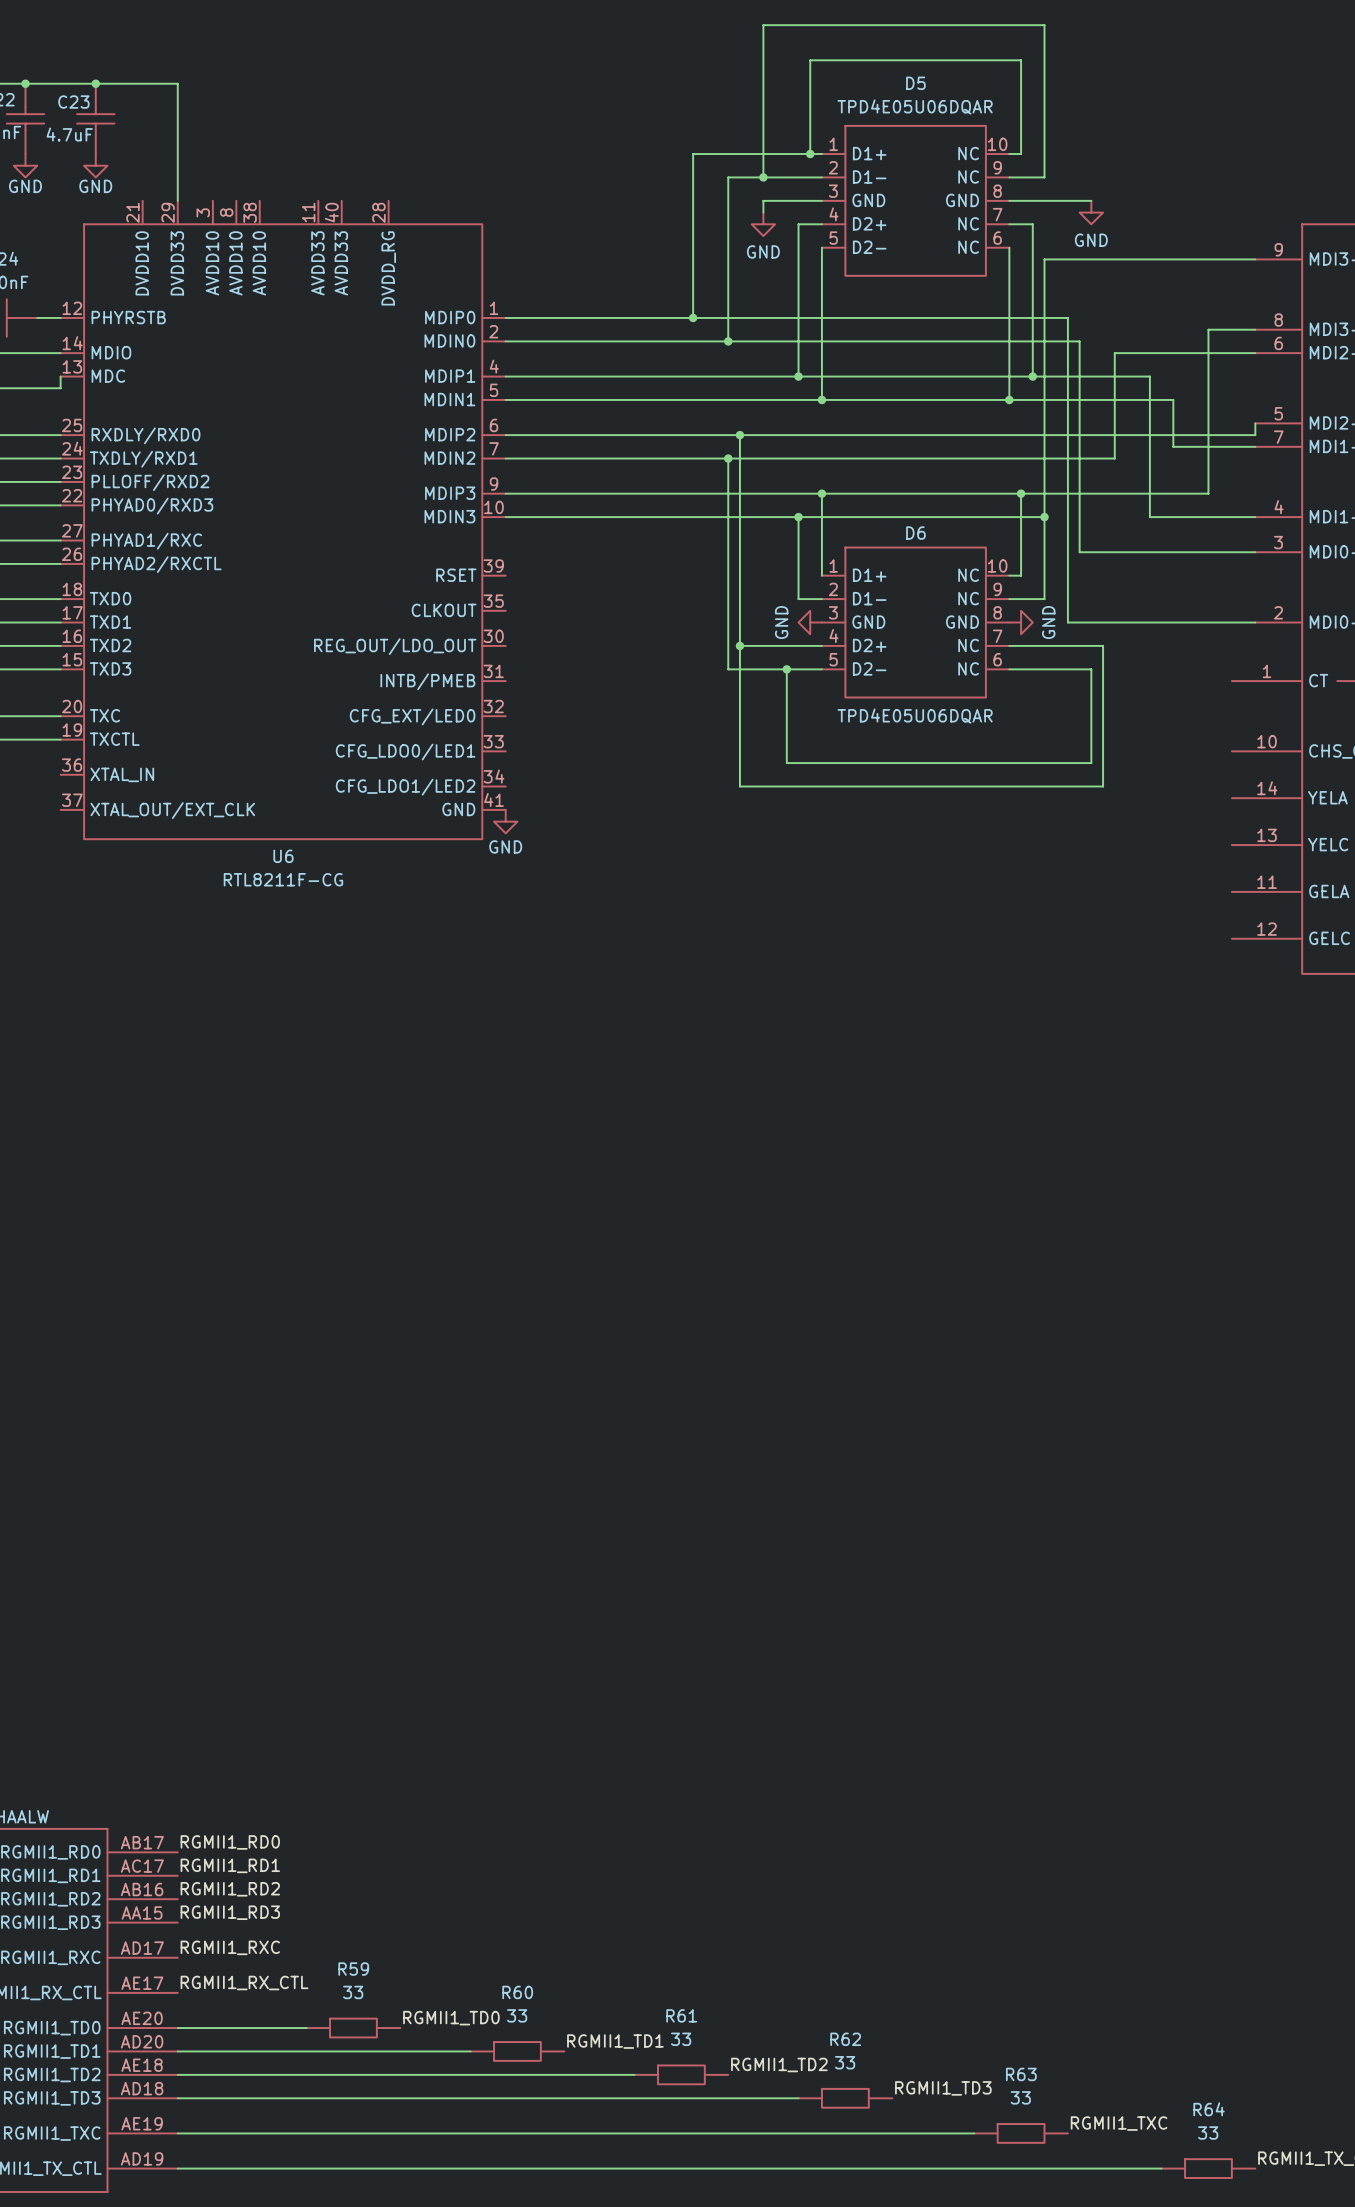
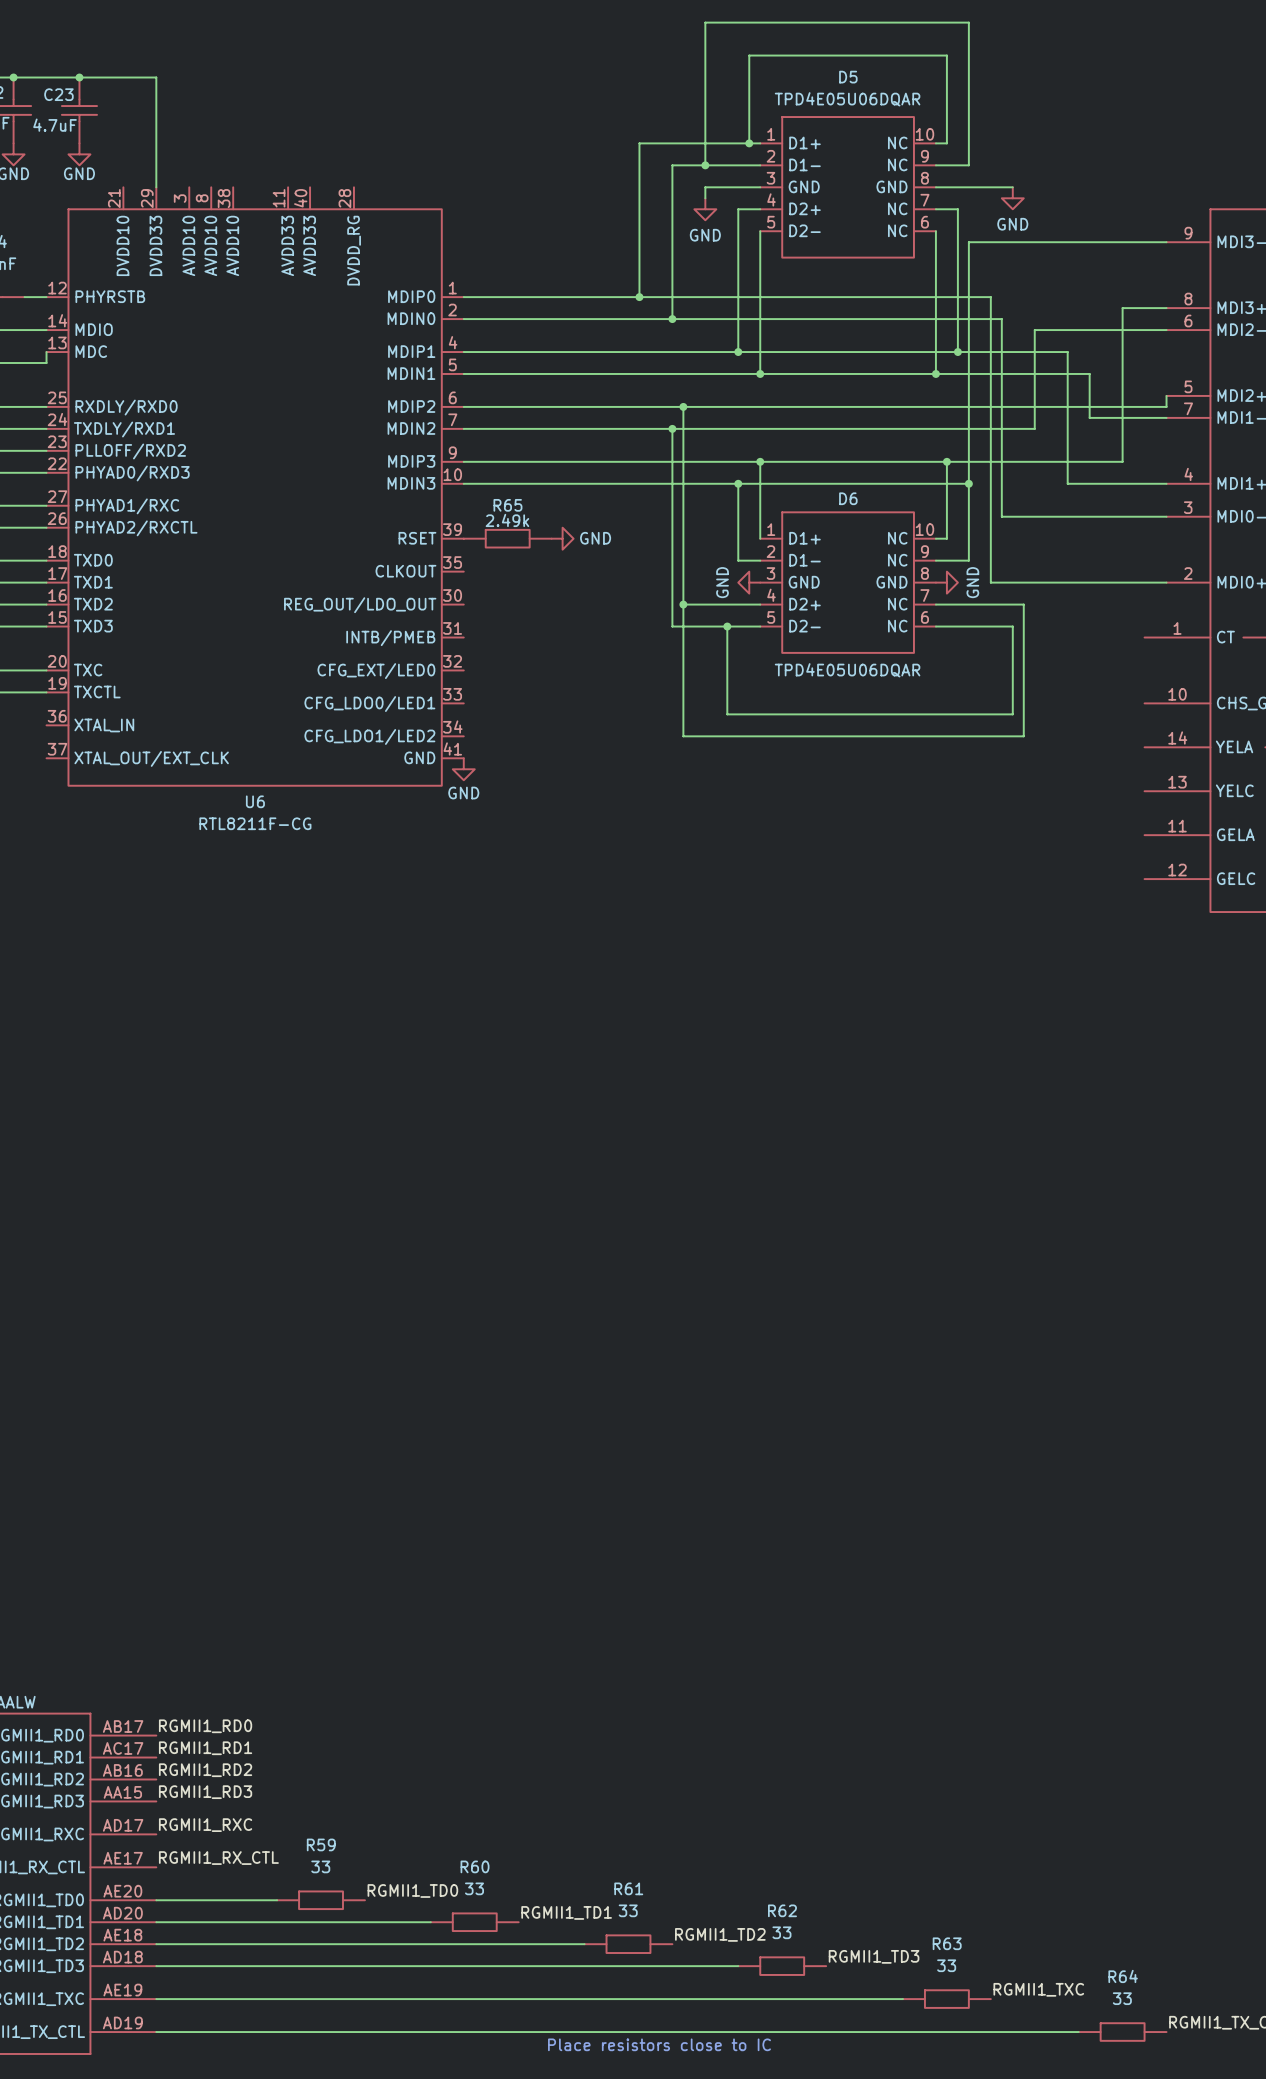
R65: none -> (507, 538)
power symbol: none -> GND (562, 538)
text: none -> Place resistors close to IC (659, 2044)

